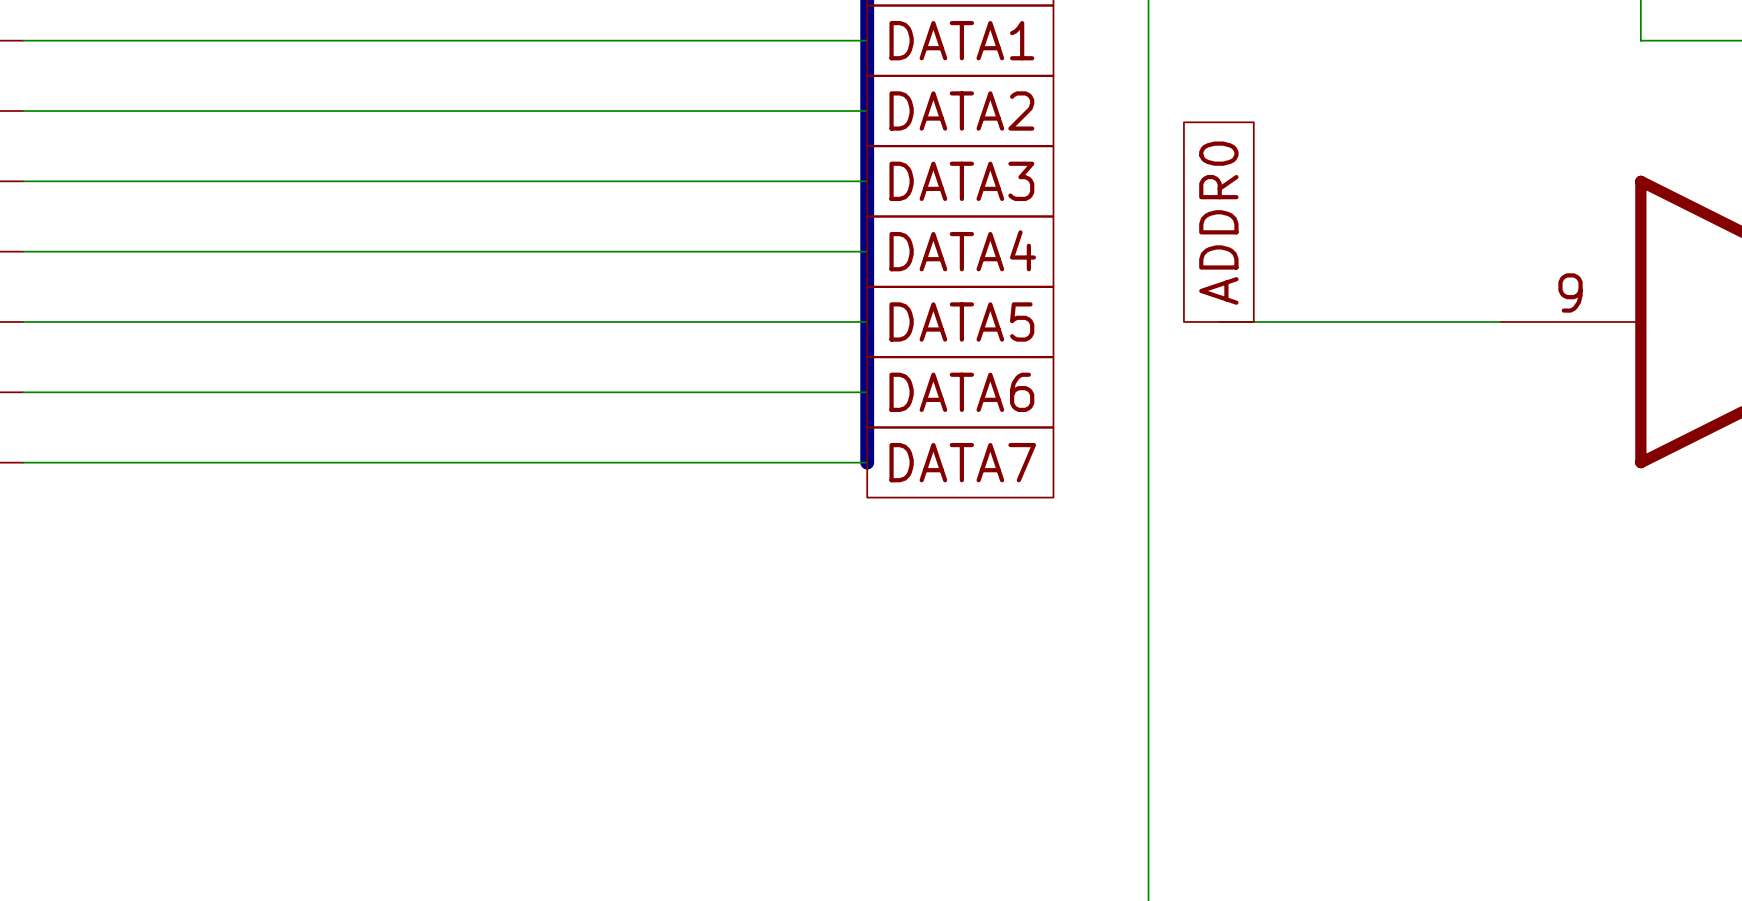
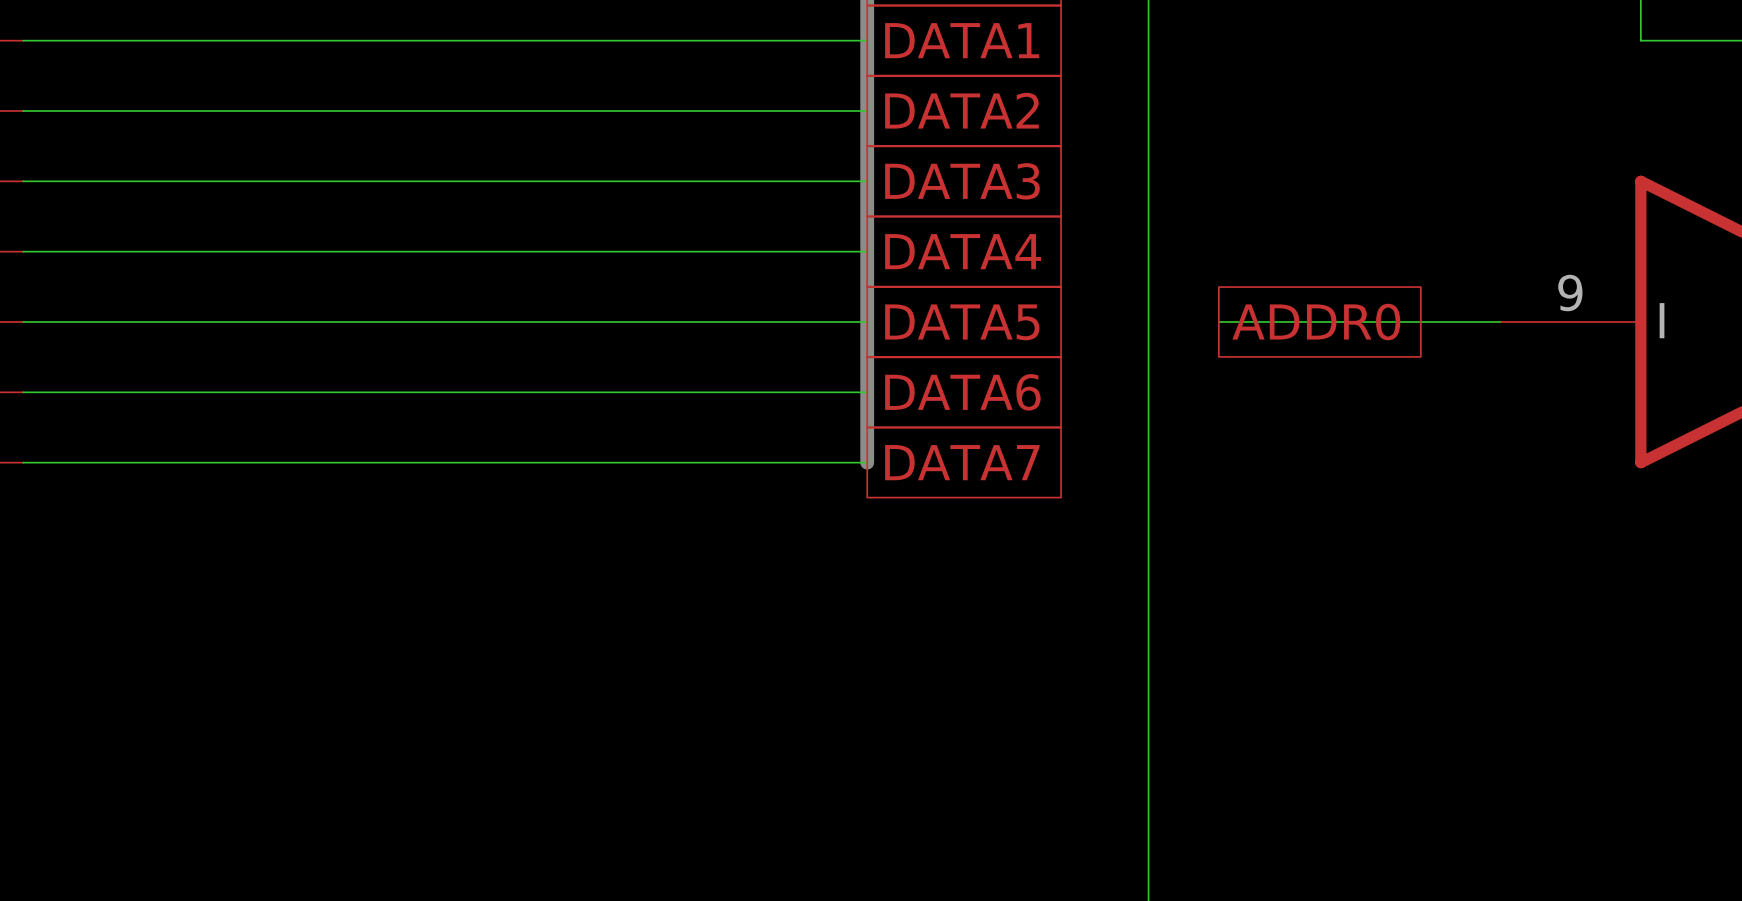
global label rotation: 0° (1218, 223) -> 90° clockwise (1316, 322)
part pin name: none -> I (1662, 320)

